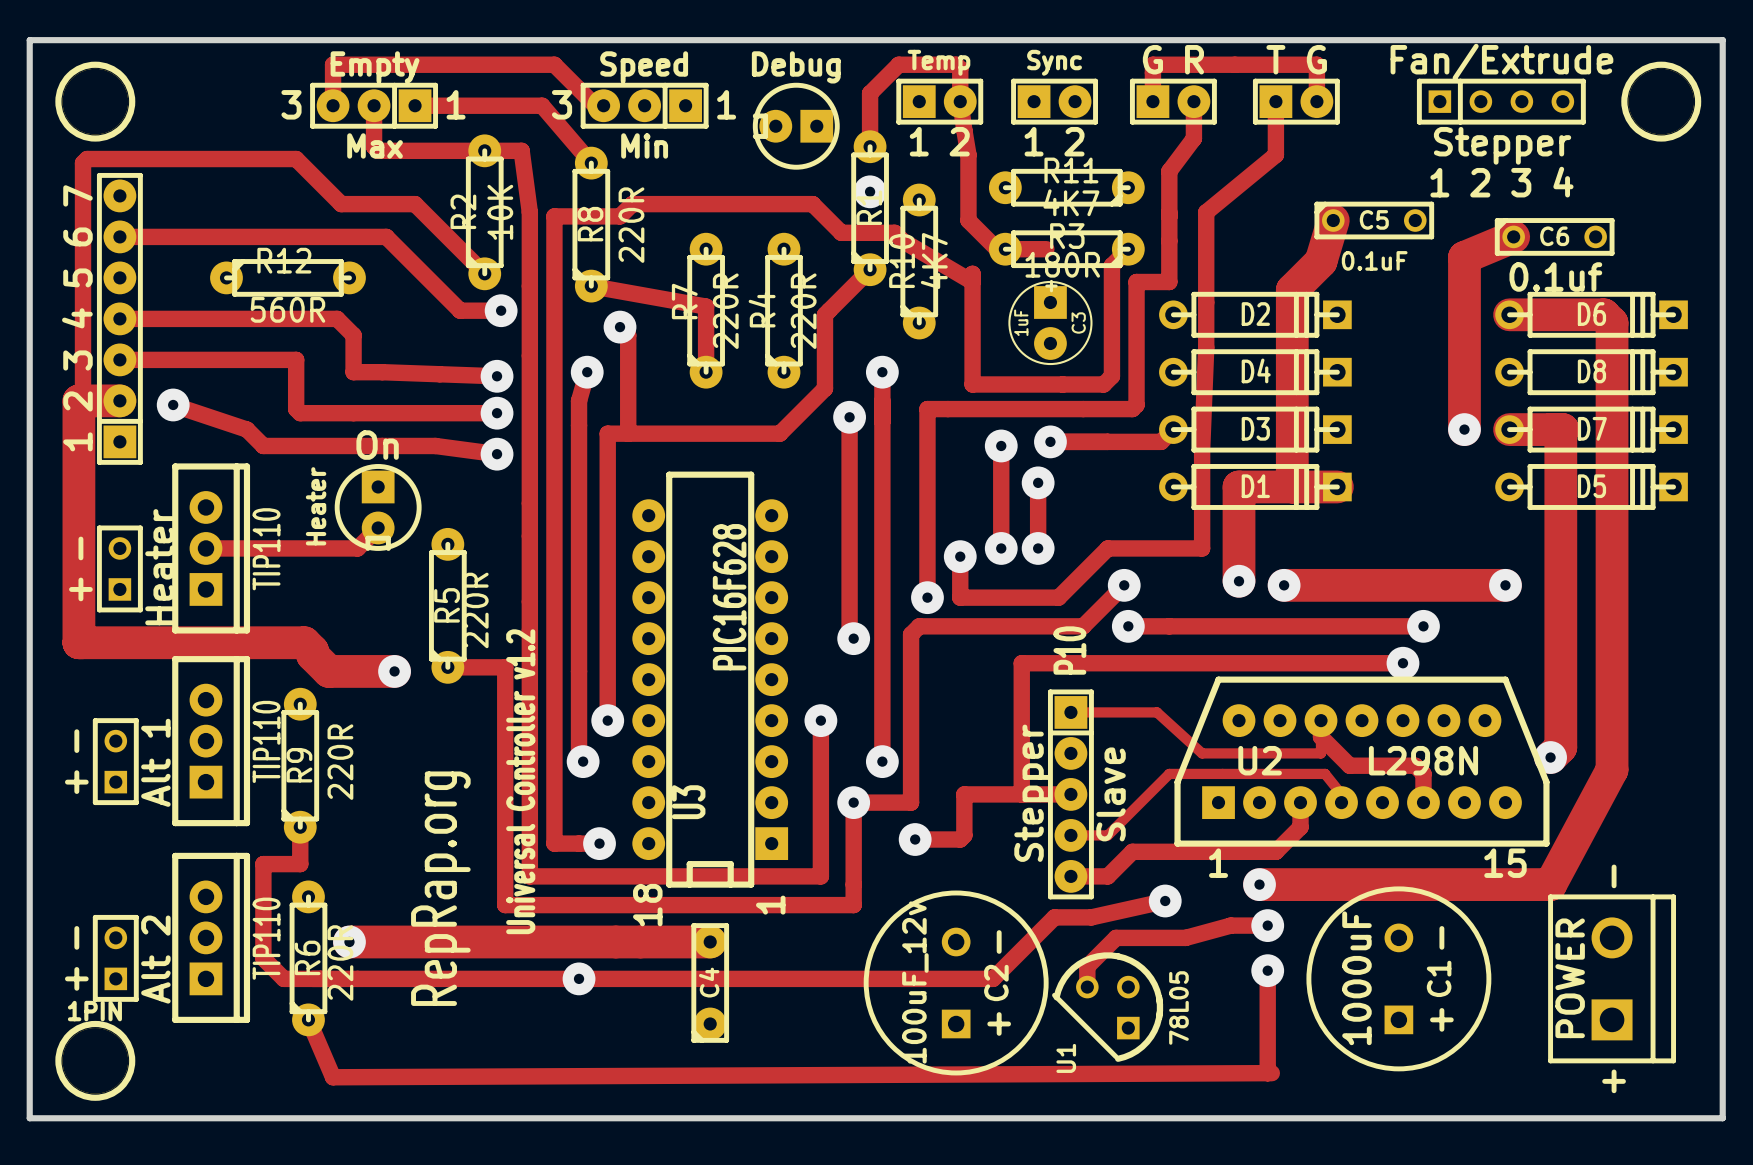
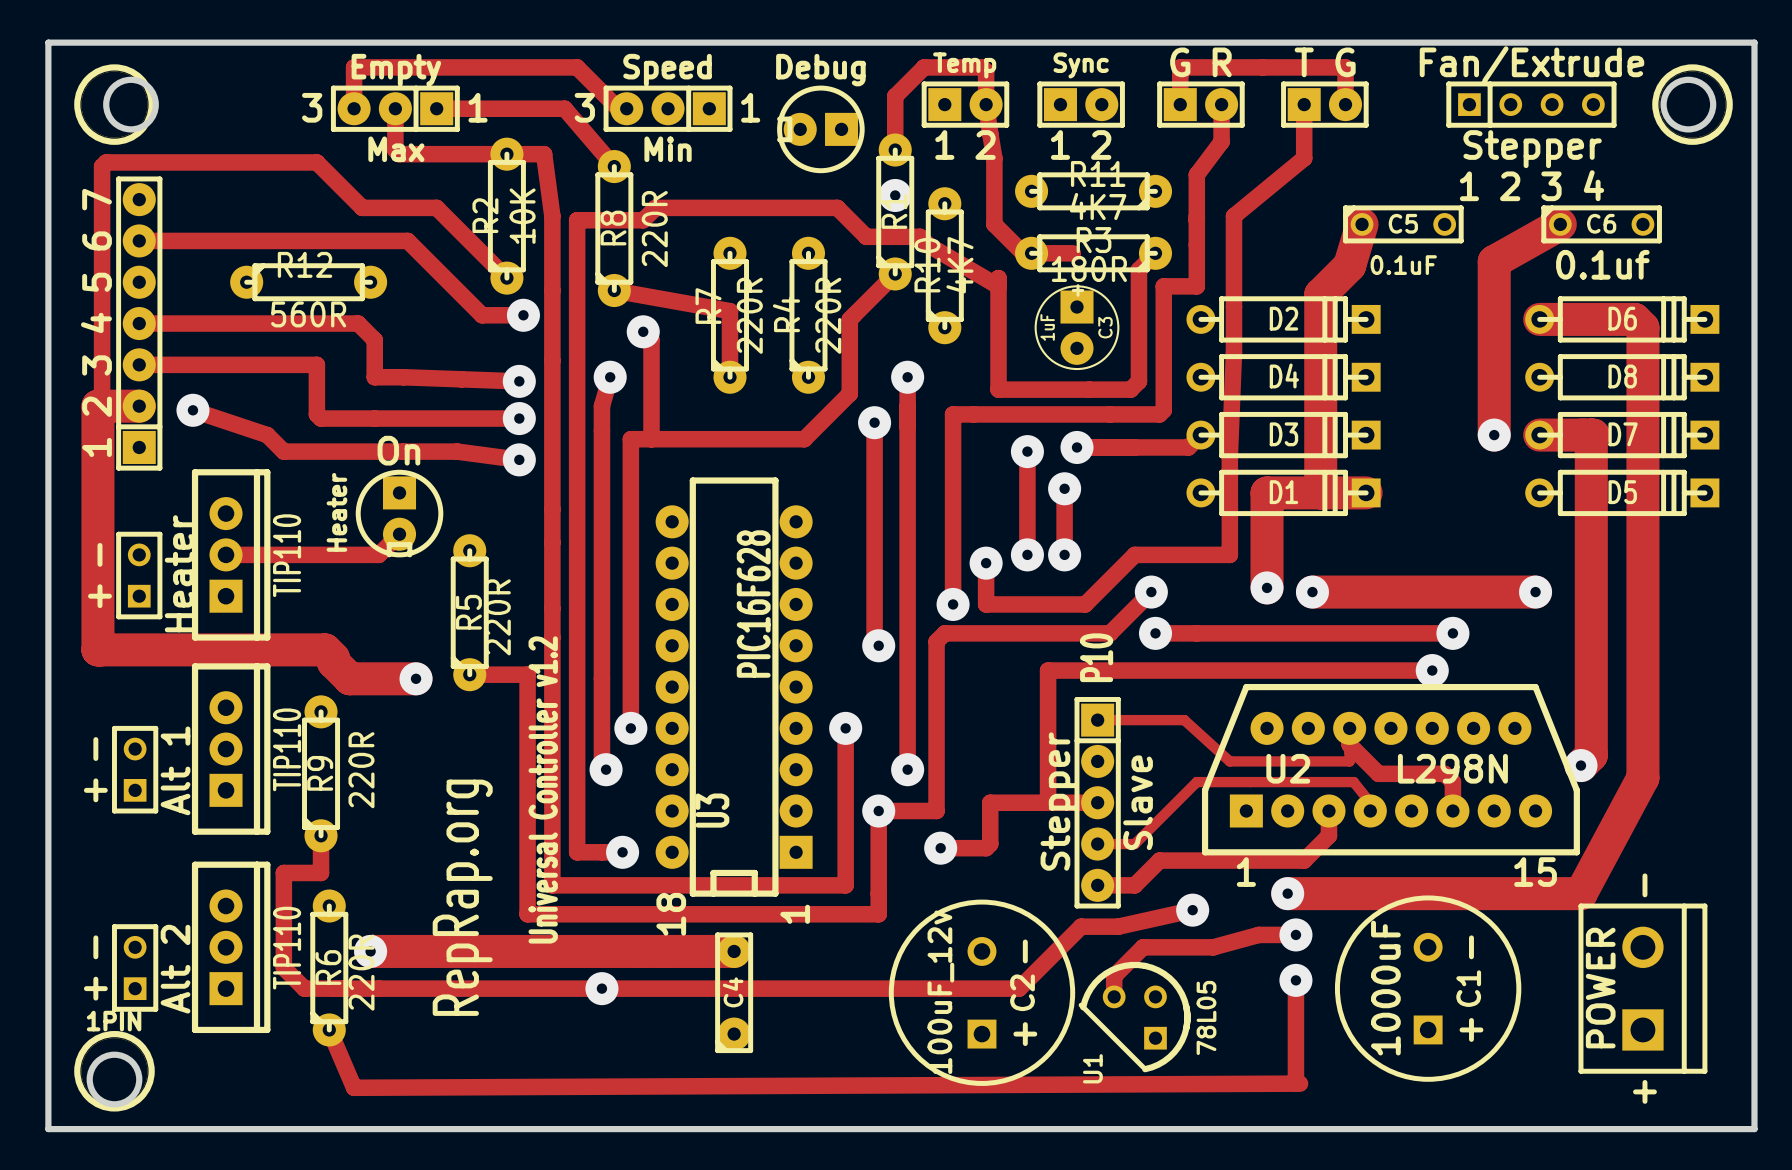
round board edge: none -> [103, 76, 159, 133]
round board edge: none -> [1660, 76, 1717, 133]
track: (1513, 236) (1464, 257) -> (1560, 224) (1494, 261)
C6 position: (1554, 236) -> (1601, 224)
round board edge: none -> [86, 1051, 143, 1108]

